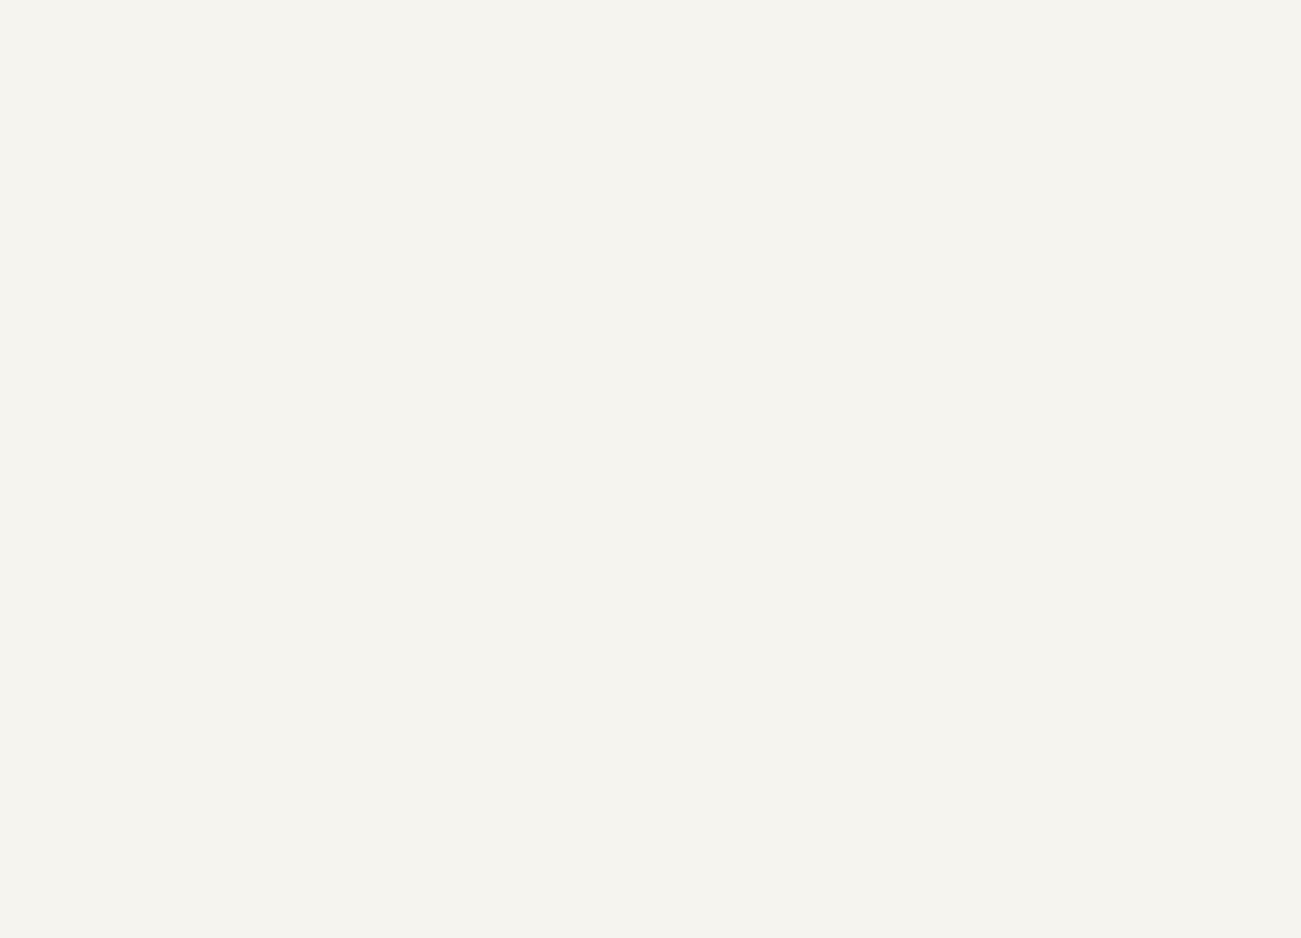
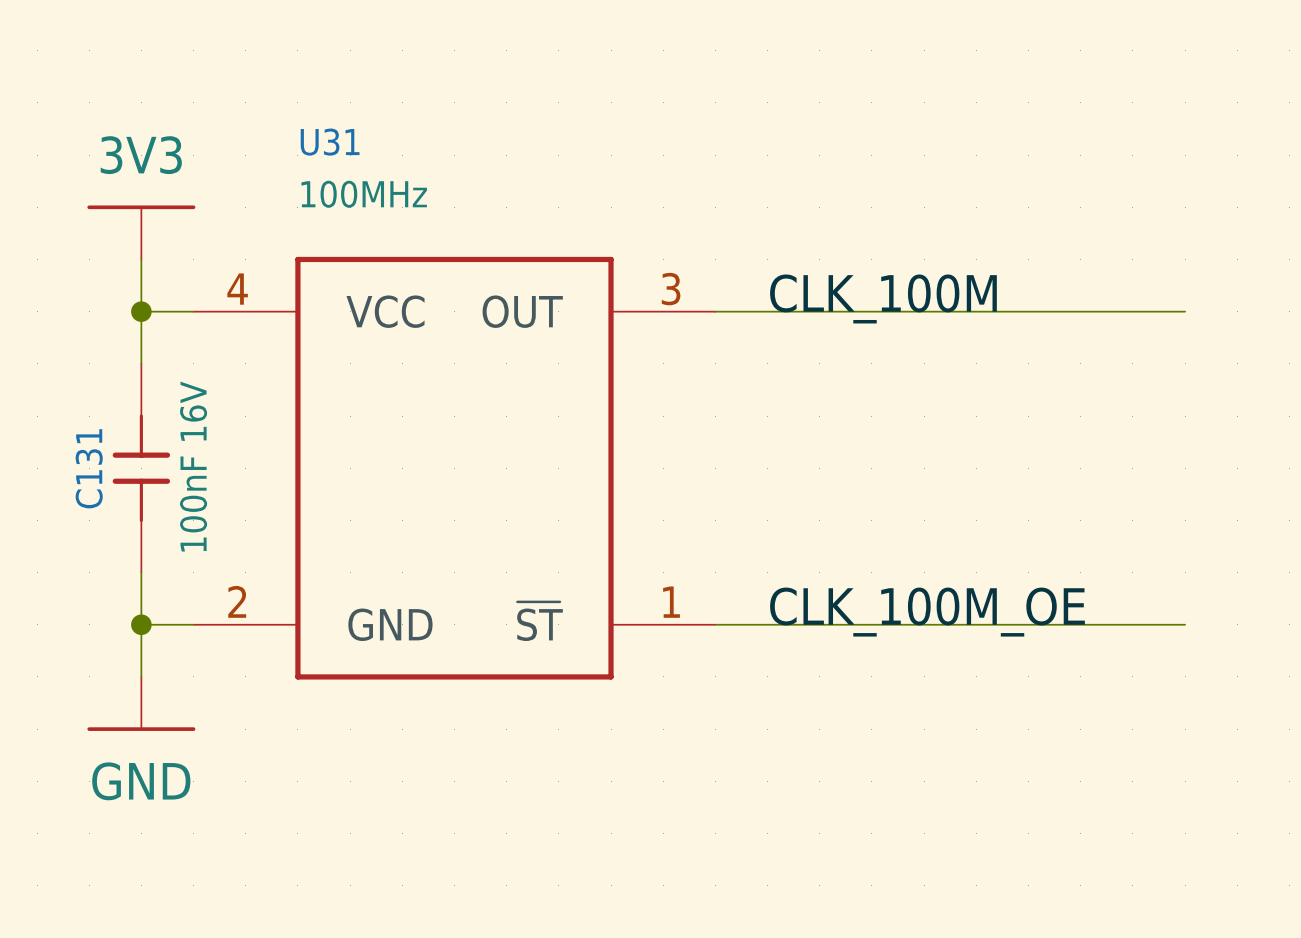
power symbol: none -> 3V3 (141, 232)
wire: none -> (141, 259) (141, 363)
label: none -> CLK_100M (883, 298)
wire: none -> (141, 311) (193, 311)
junction: none -> (141, 311)
wire: none -> (715, 311) (1185, 311)
C131: none -> 100nF 16V (141, 468)
U31: none -> 100MHz (454, 468)
wire: none -> (141, 572) (141, 676)
label: none -> CLK_100M_OE (927, 612)
wire: none -> (141, 624) (193, 624)
junction: none -> (141, 624)
wire: none -> (715, 624) (1185, 624)
power symbol: none -> GND (141, 703)

